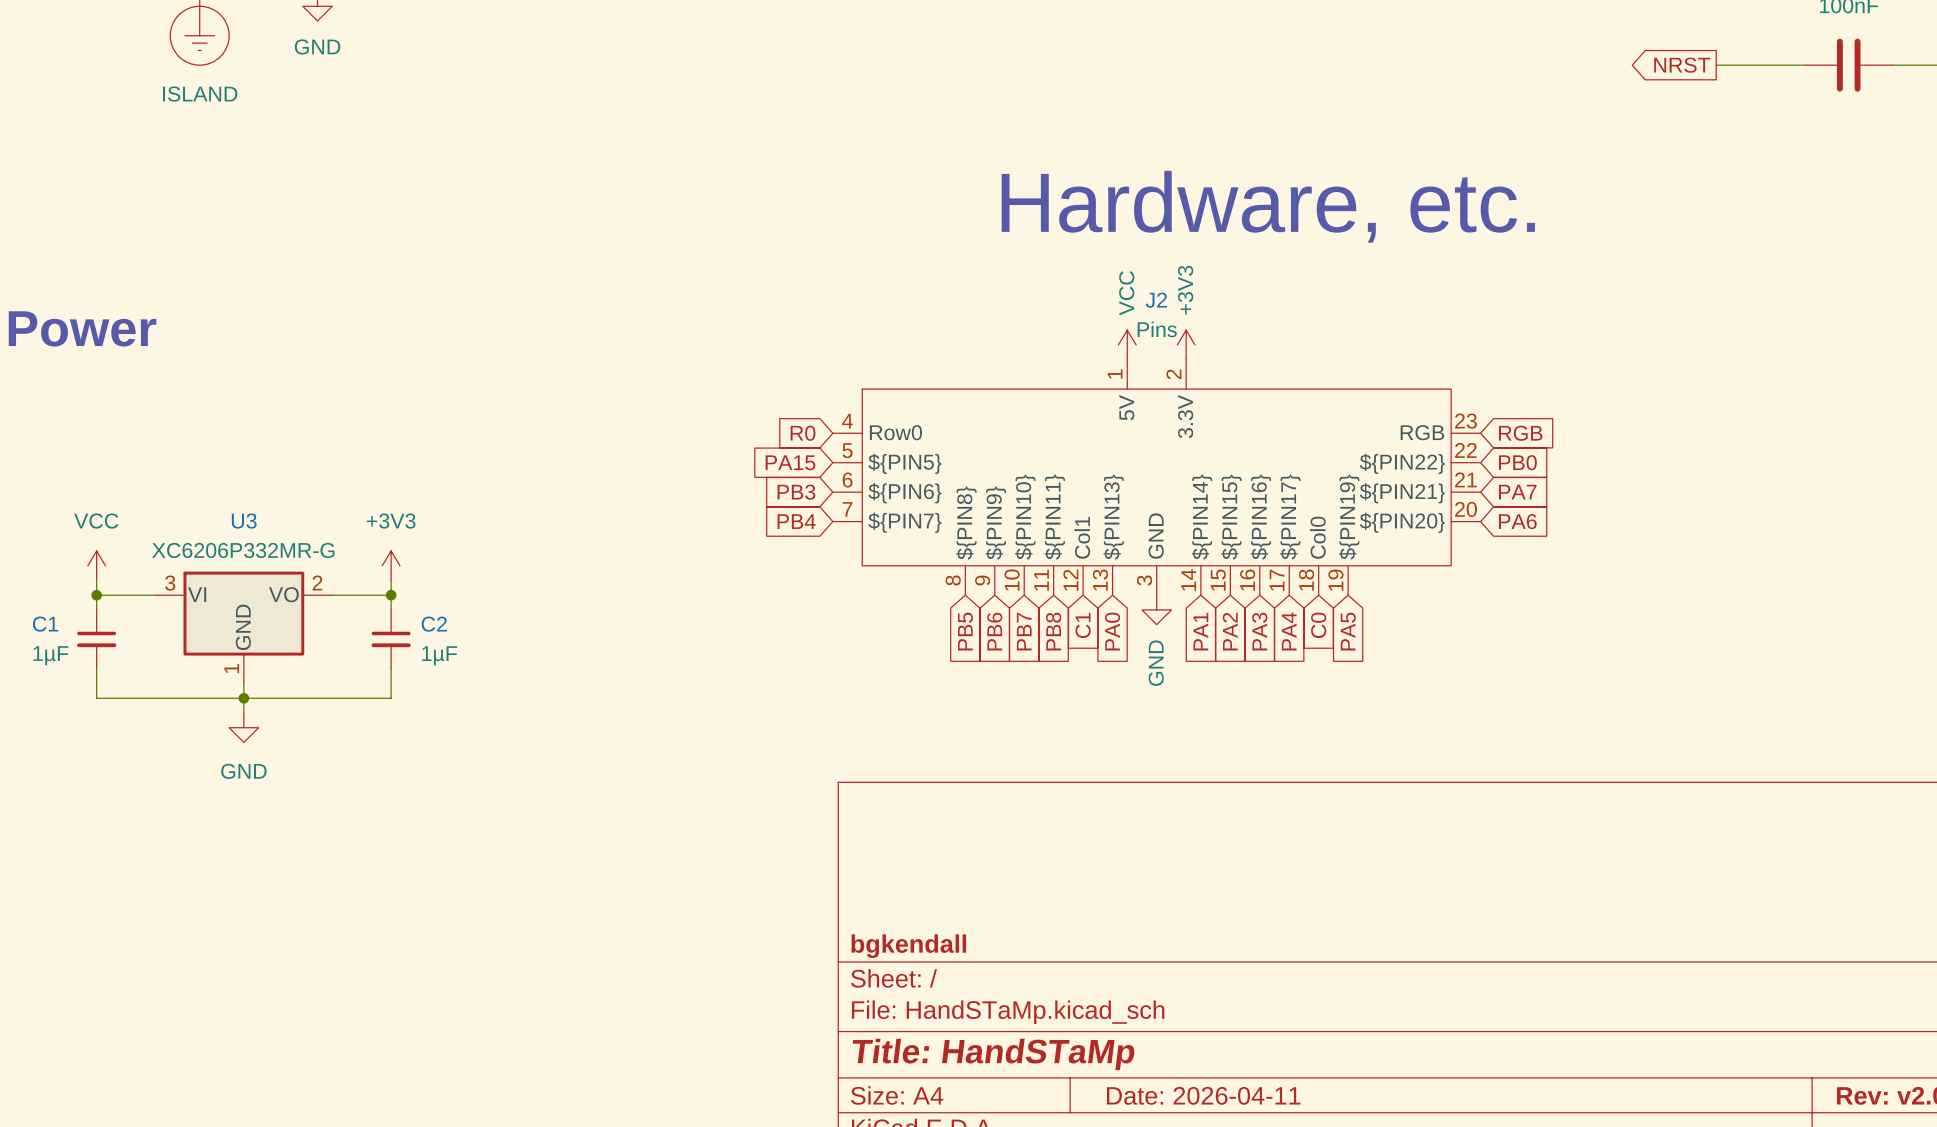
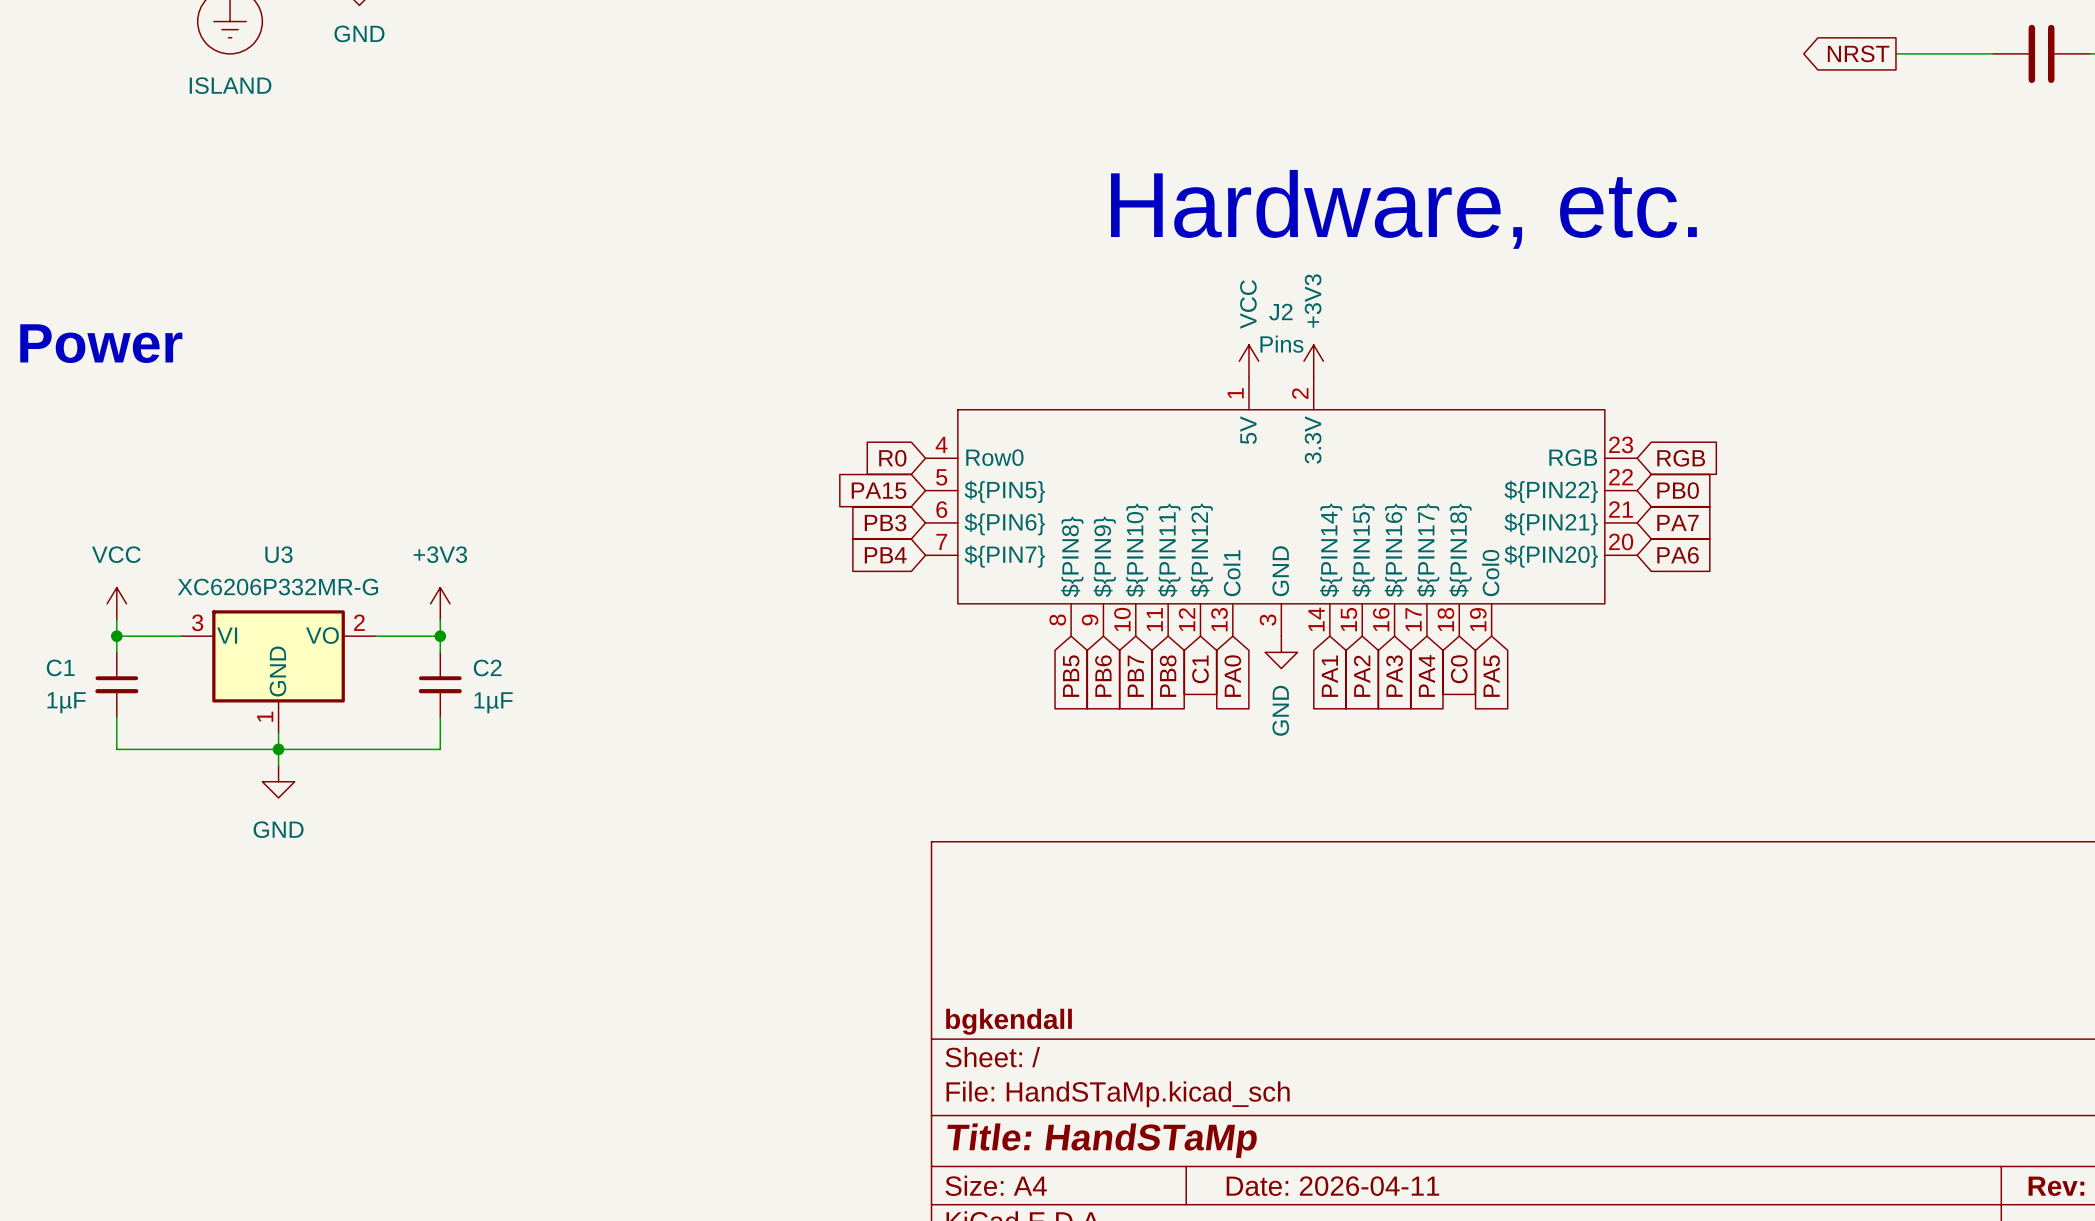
J2 pin name: ${PIN13} (1113, 517) -> Col1 (1231, 573)
J2 pin name: ${PIN19} (1349, 517) -> Col0 (1490, 573)
J2 pin name: Col1 (1082, 537) -> ${PIN12} (1201, 550)
J2 pin name: Col0 (1317, 537) -> ${PIN18} (1460, 550)

